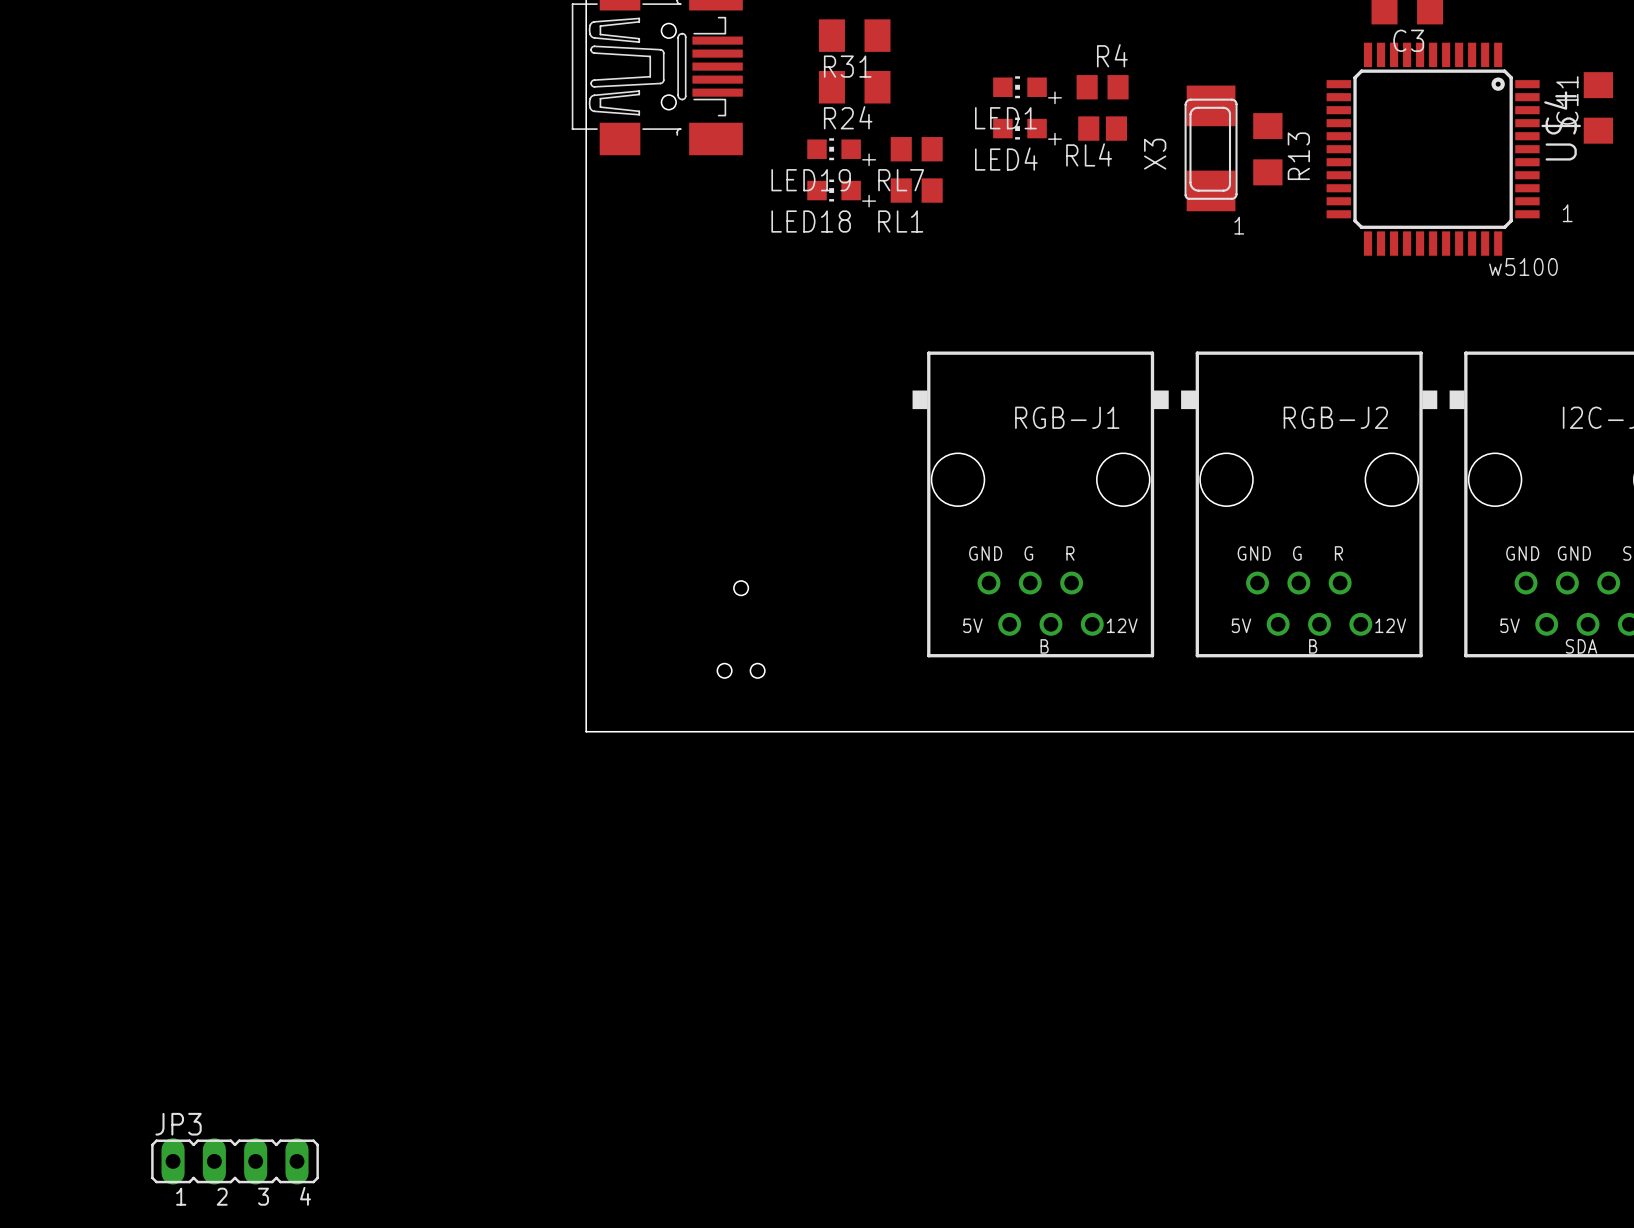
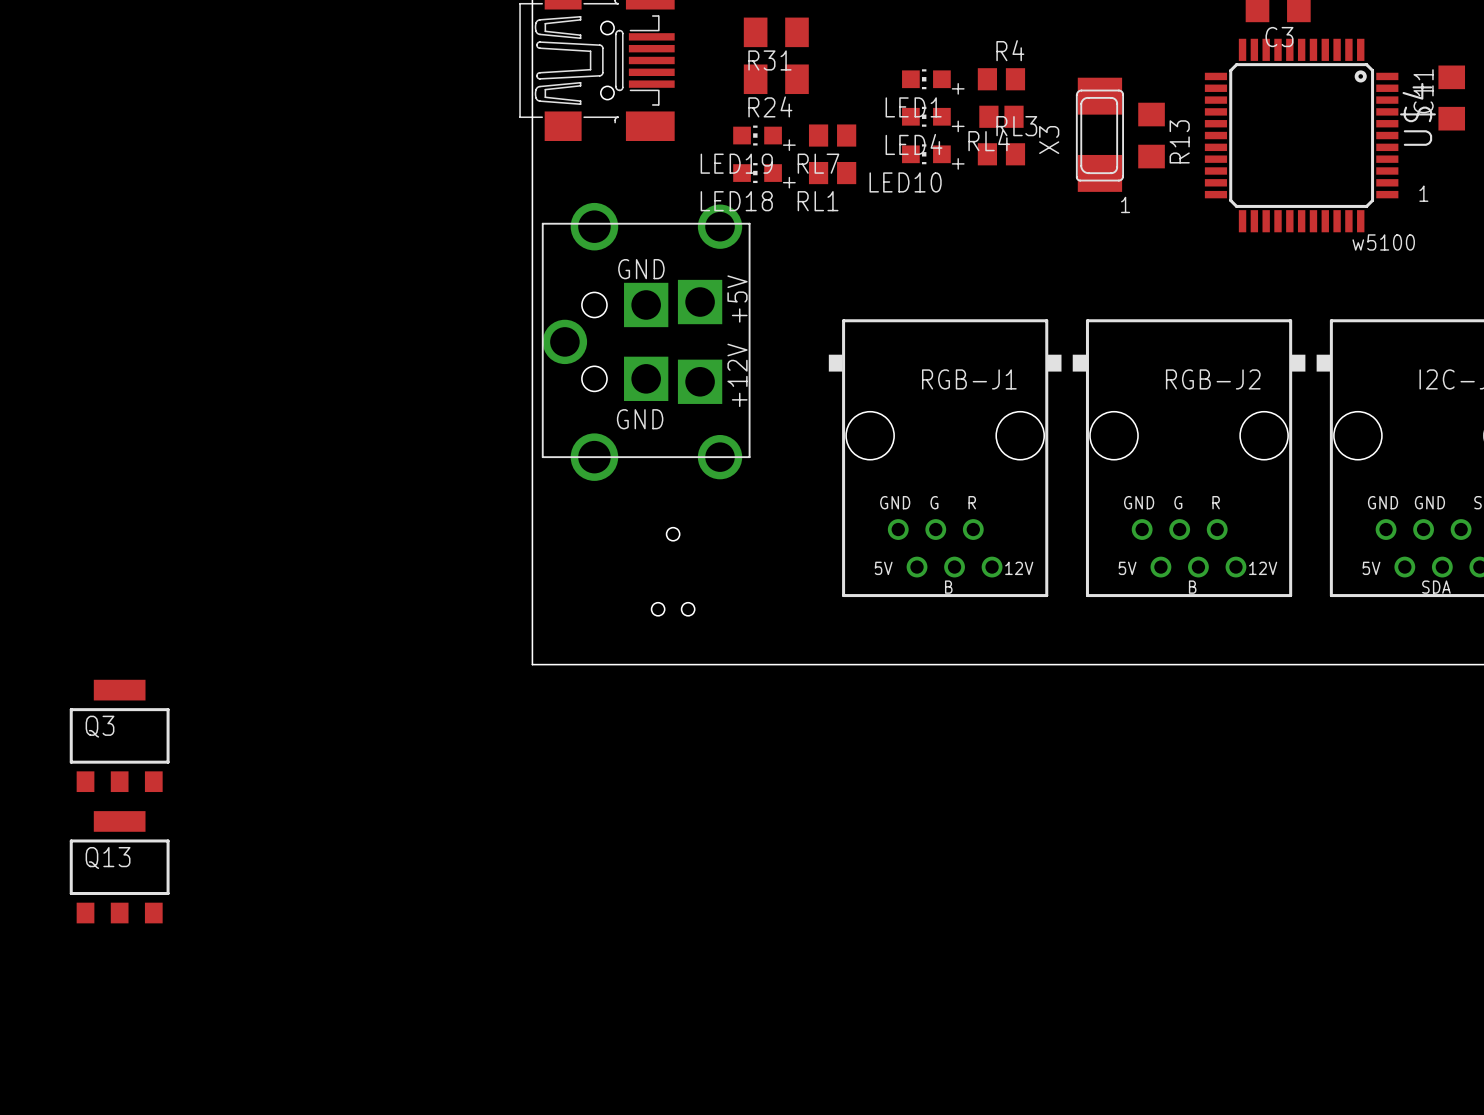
LED10: none -> (926, 154)
RL3: none -> (1001, 154)
part: none -> (646, 341)
Q3: none -> (119, 735)
Q13: none -> (119, 867)
JP3: (235, 1161) -> none

